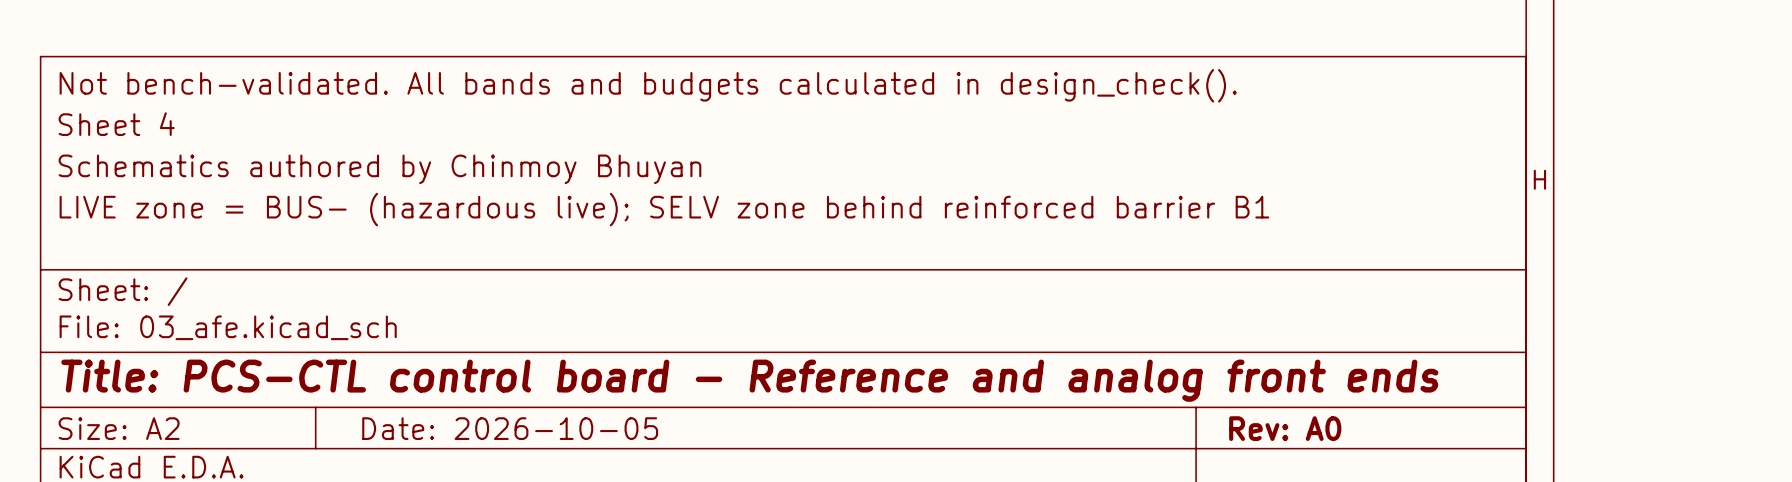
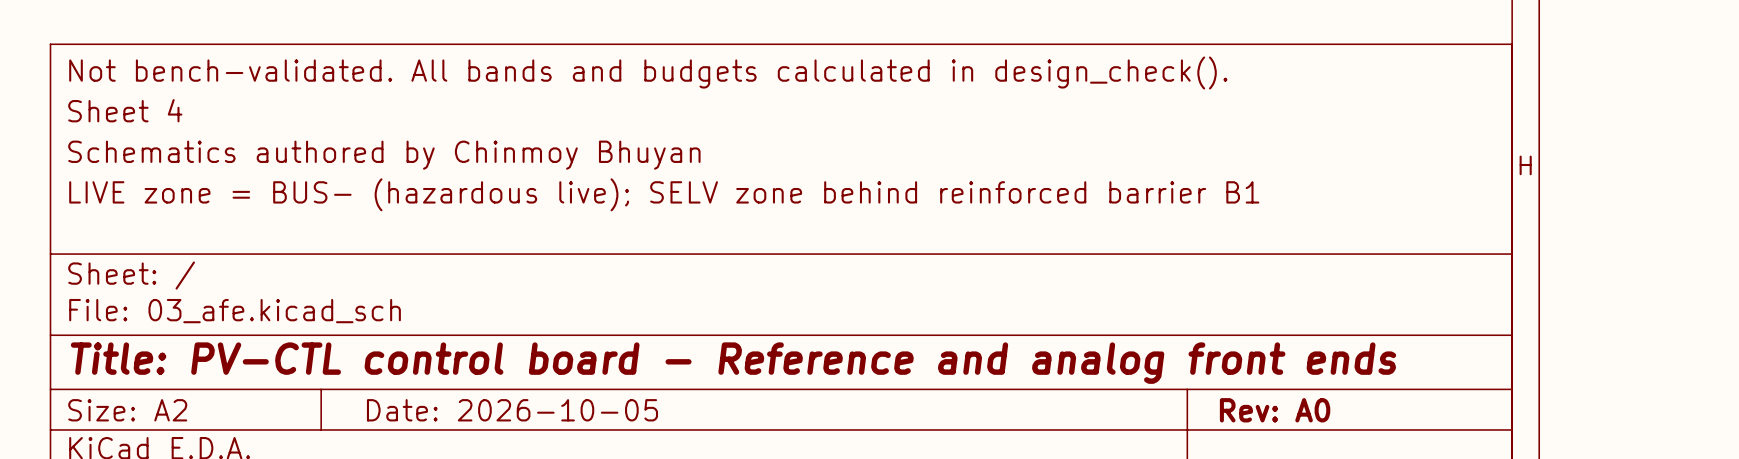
title block: Title: PCS-CTL control board - Reference and analog front ends (749, 380) -> Title: PV-CTL control board - Reference and analog front ends (733, 363)

